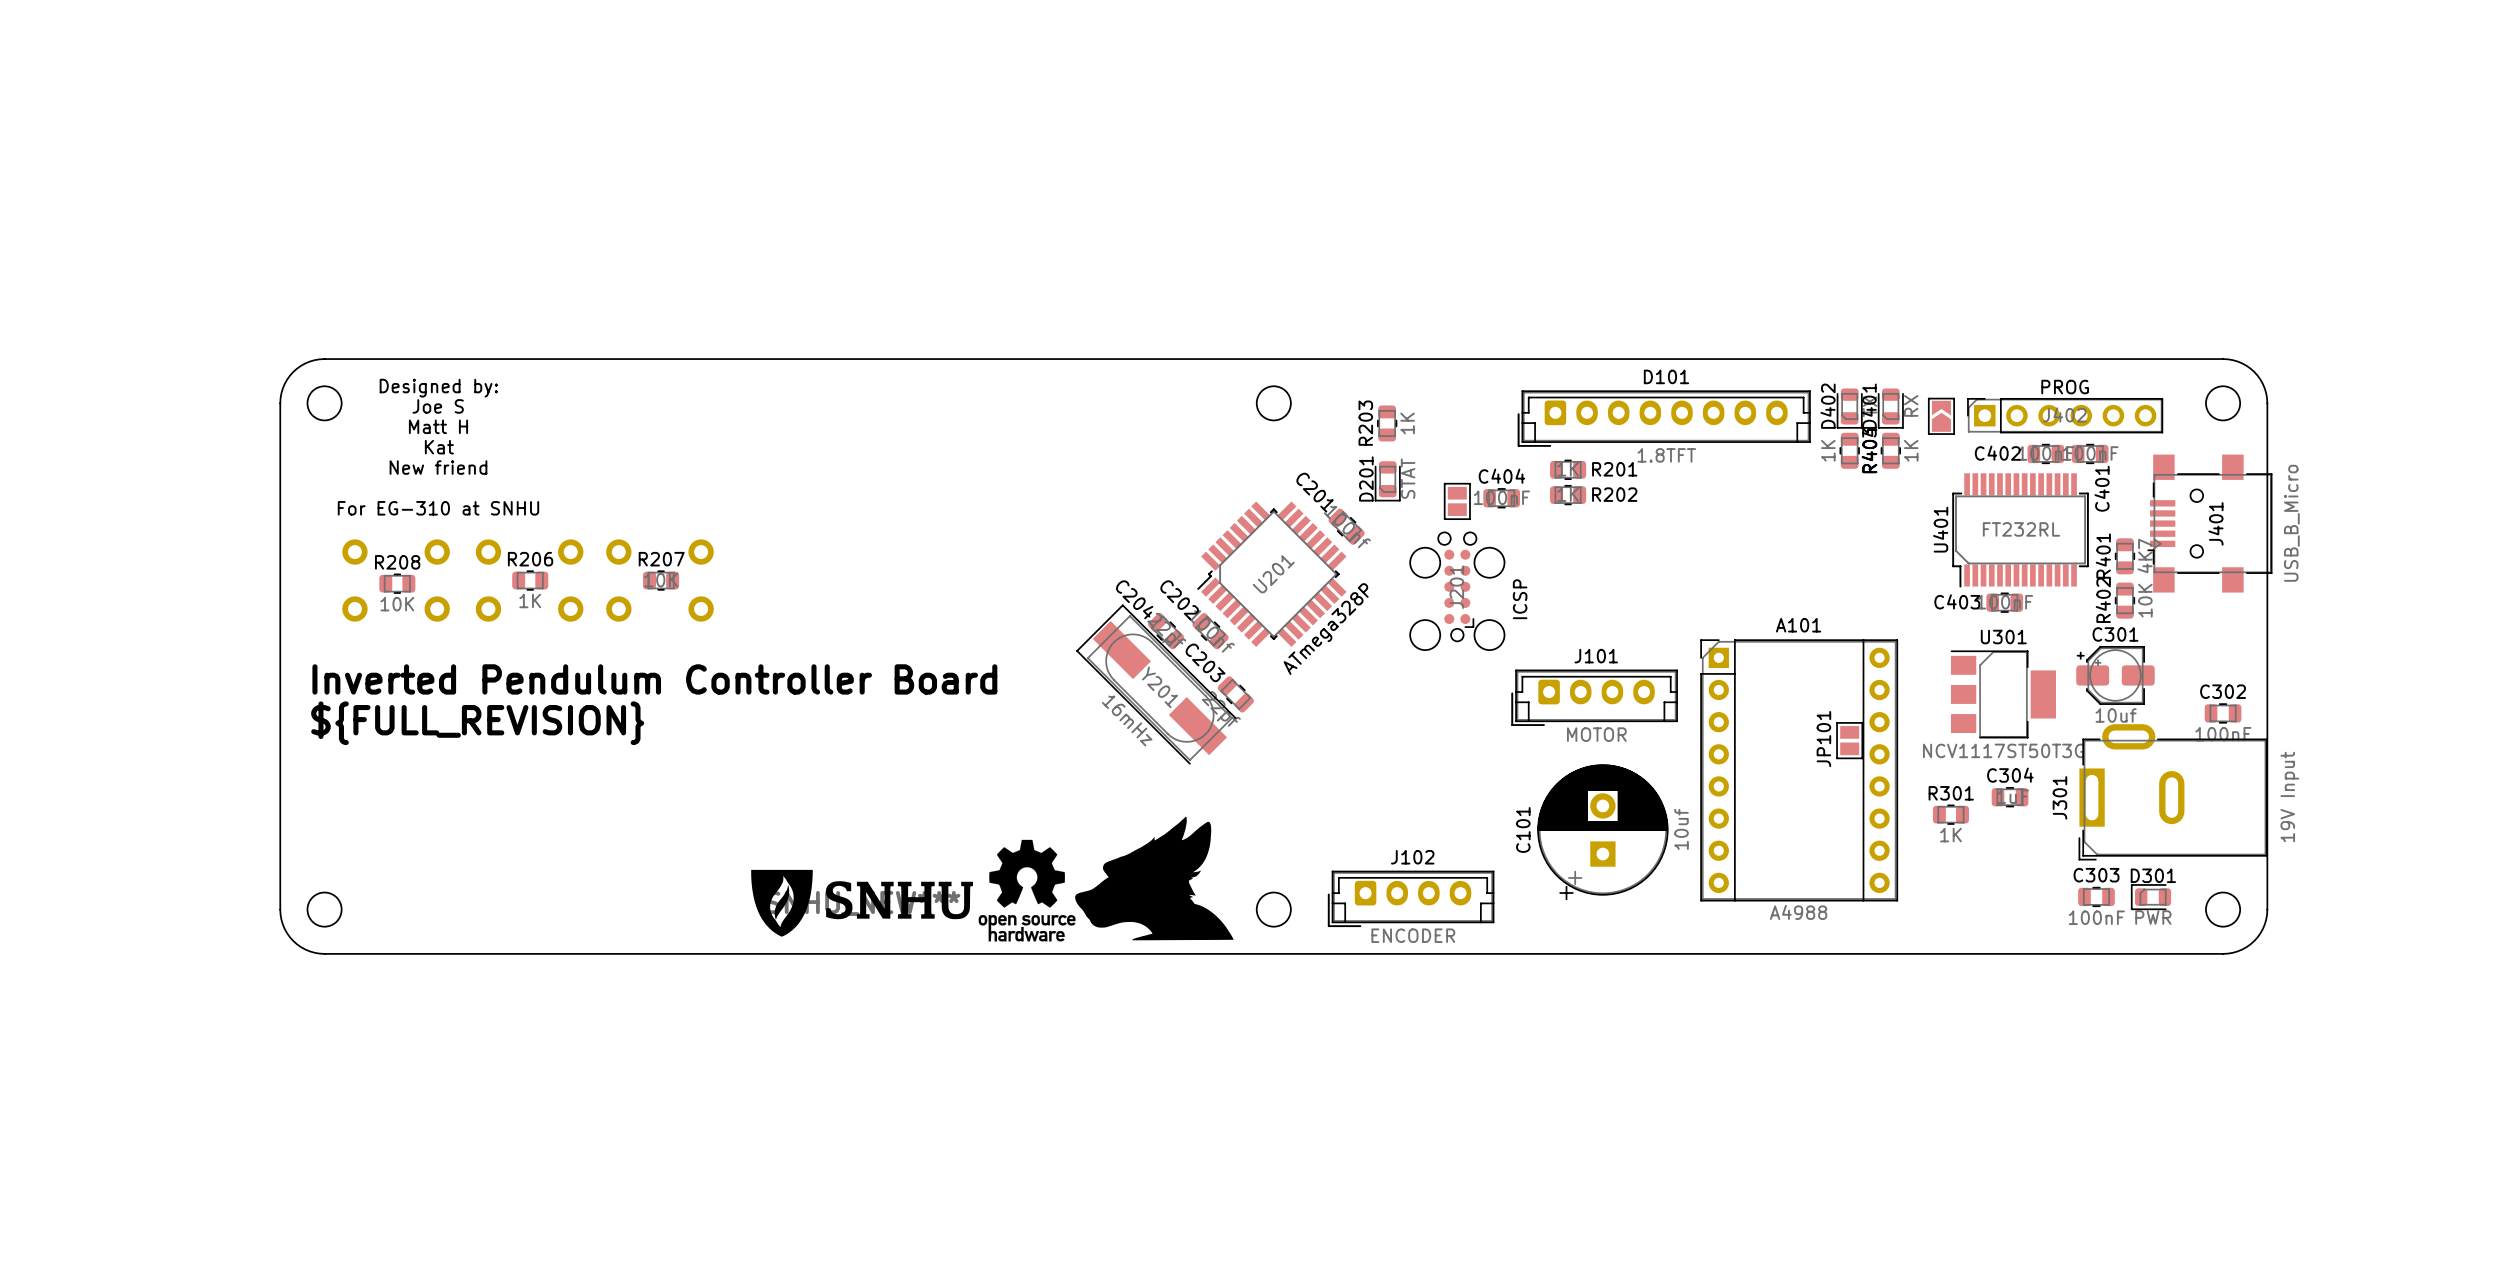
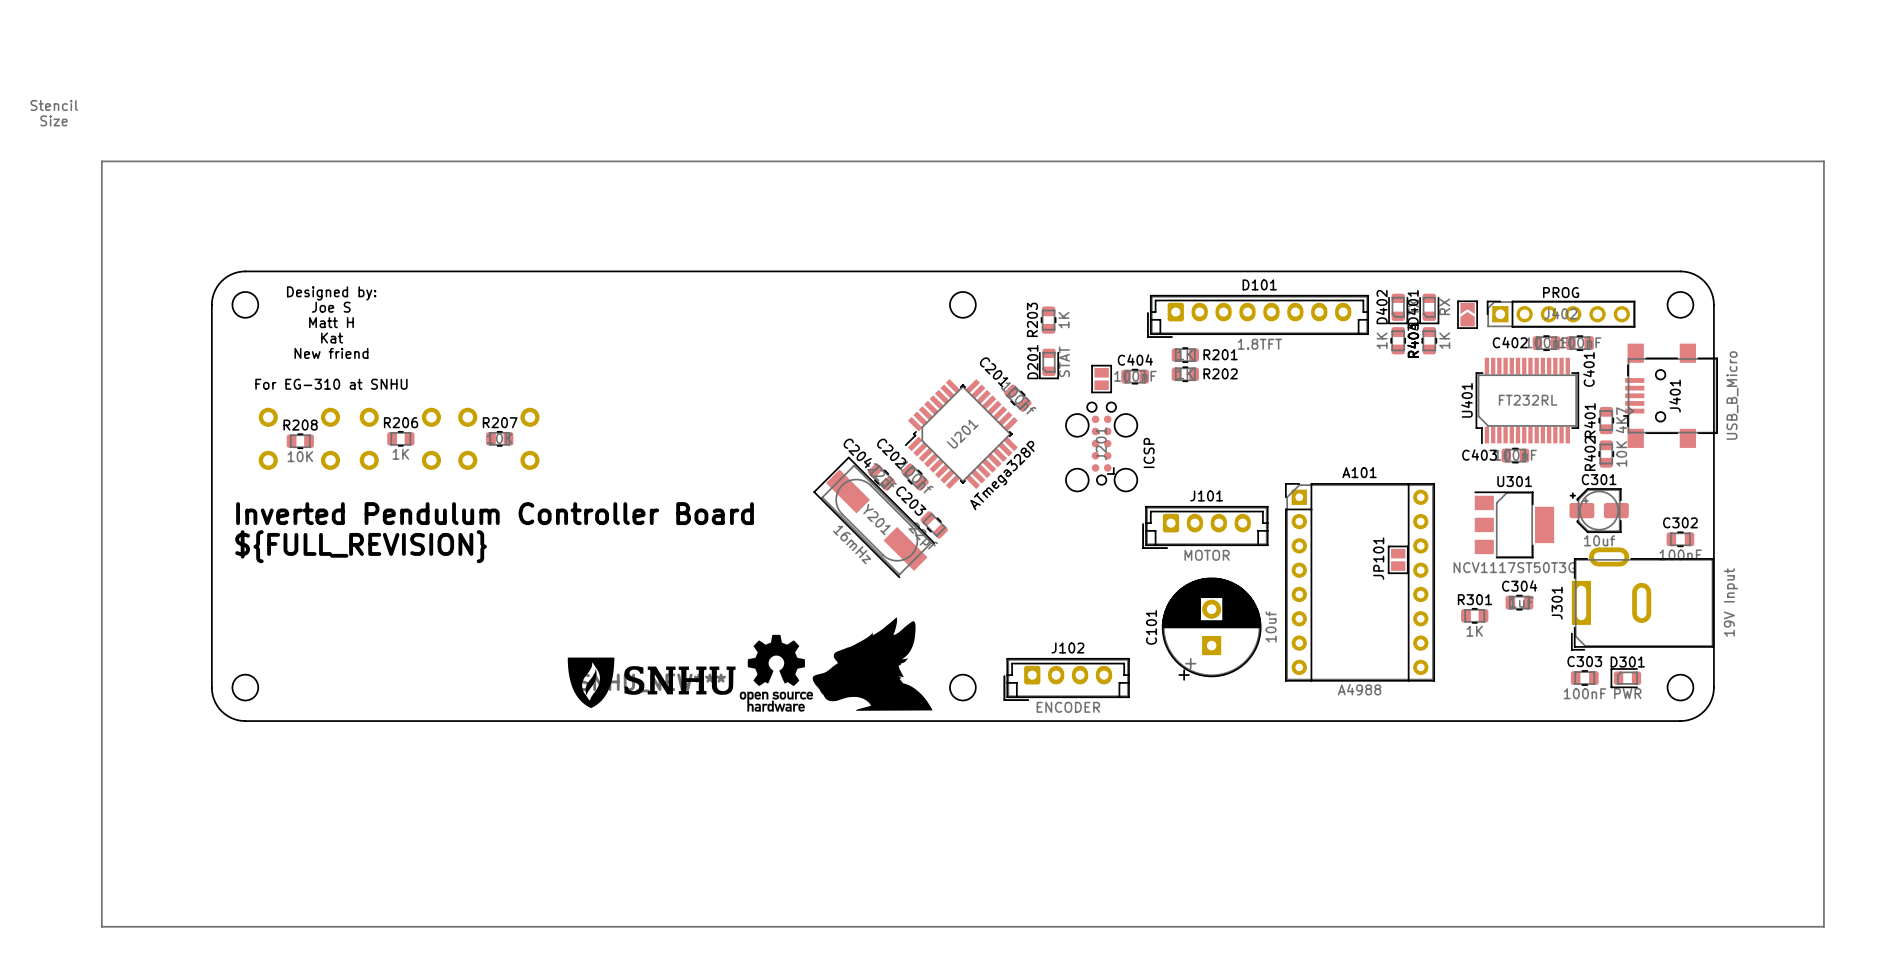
text: none -> Stencil (54, 105)
text: none -> Size (54, 120)
line: none -> (101, 161) (1823, 161) (1823, 926) (101, 926) (101, 161)

